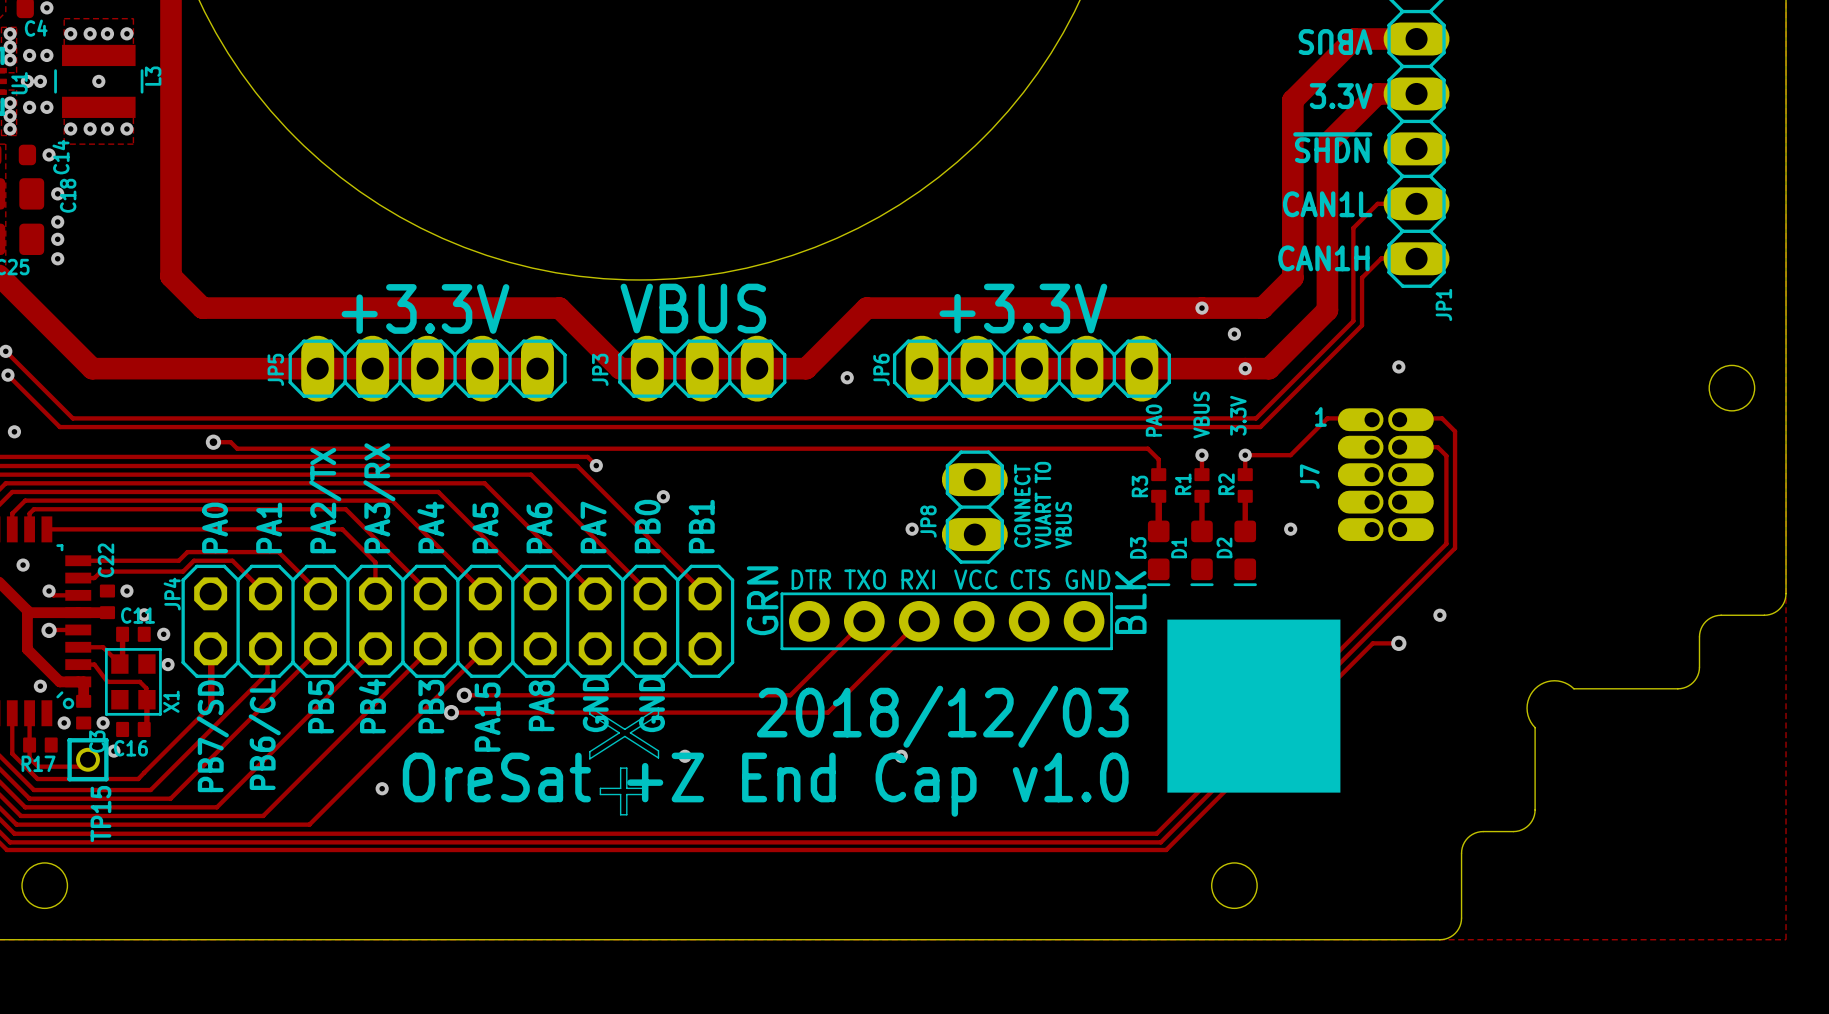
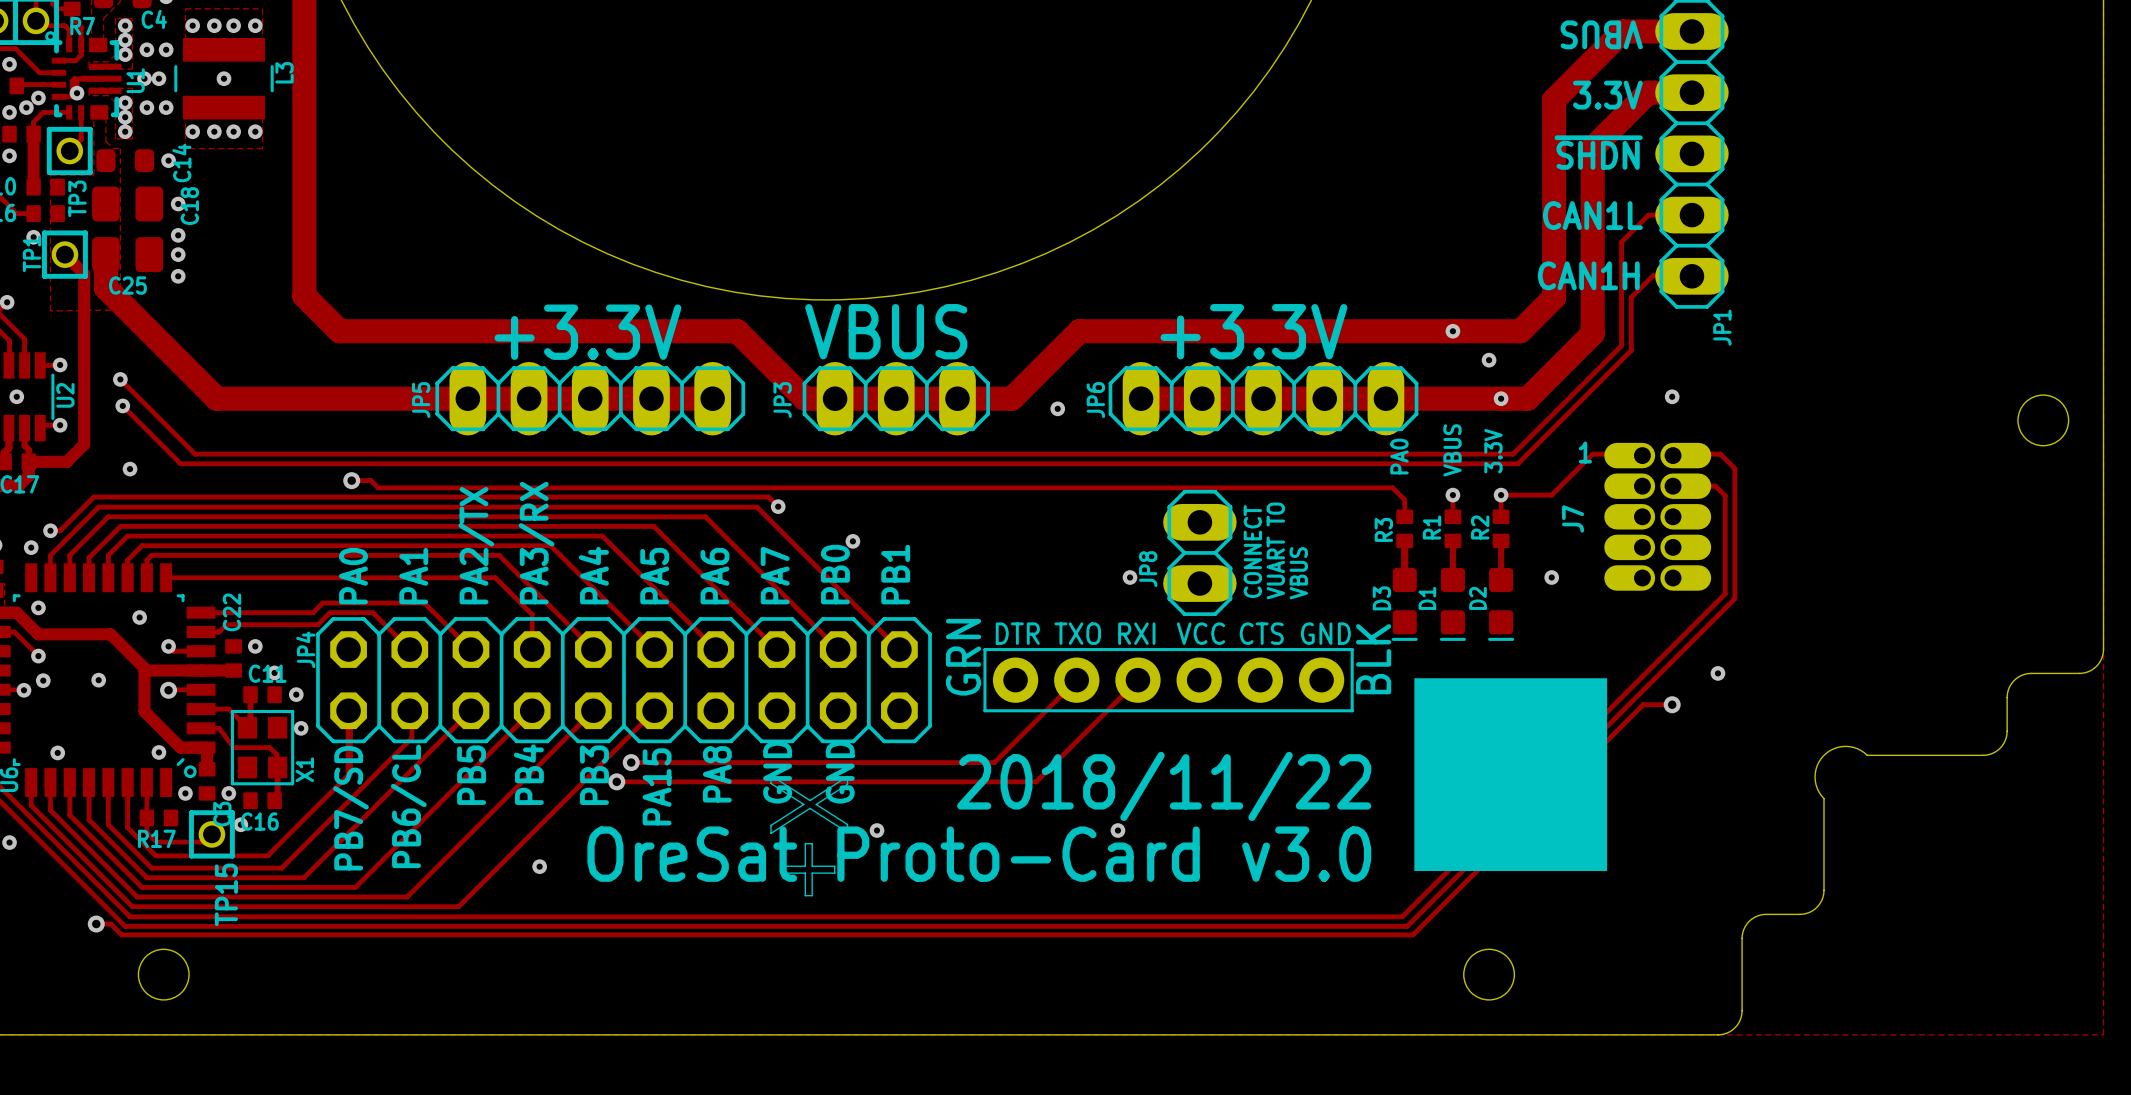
text: 2018/12/03 (942, 716) -> 2018/11/22 (1164, 786)
text: OreSat +Z End Cap v1.0 (765, 784) -> OreSat Proto-Card v3.0 (979, 854)

